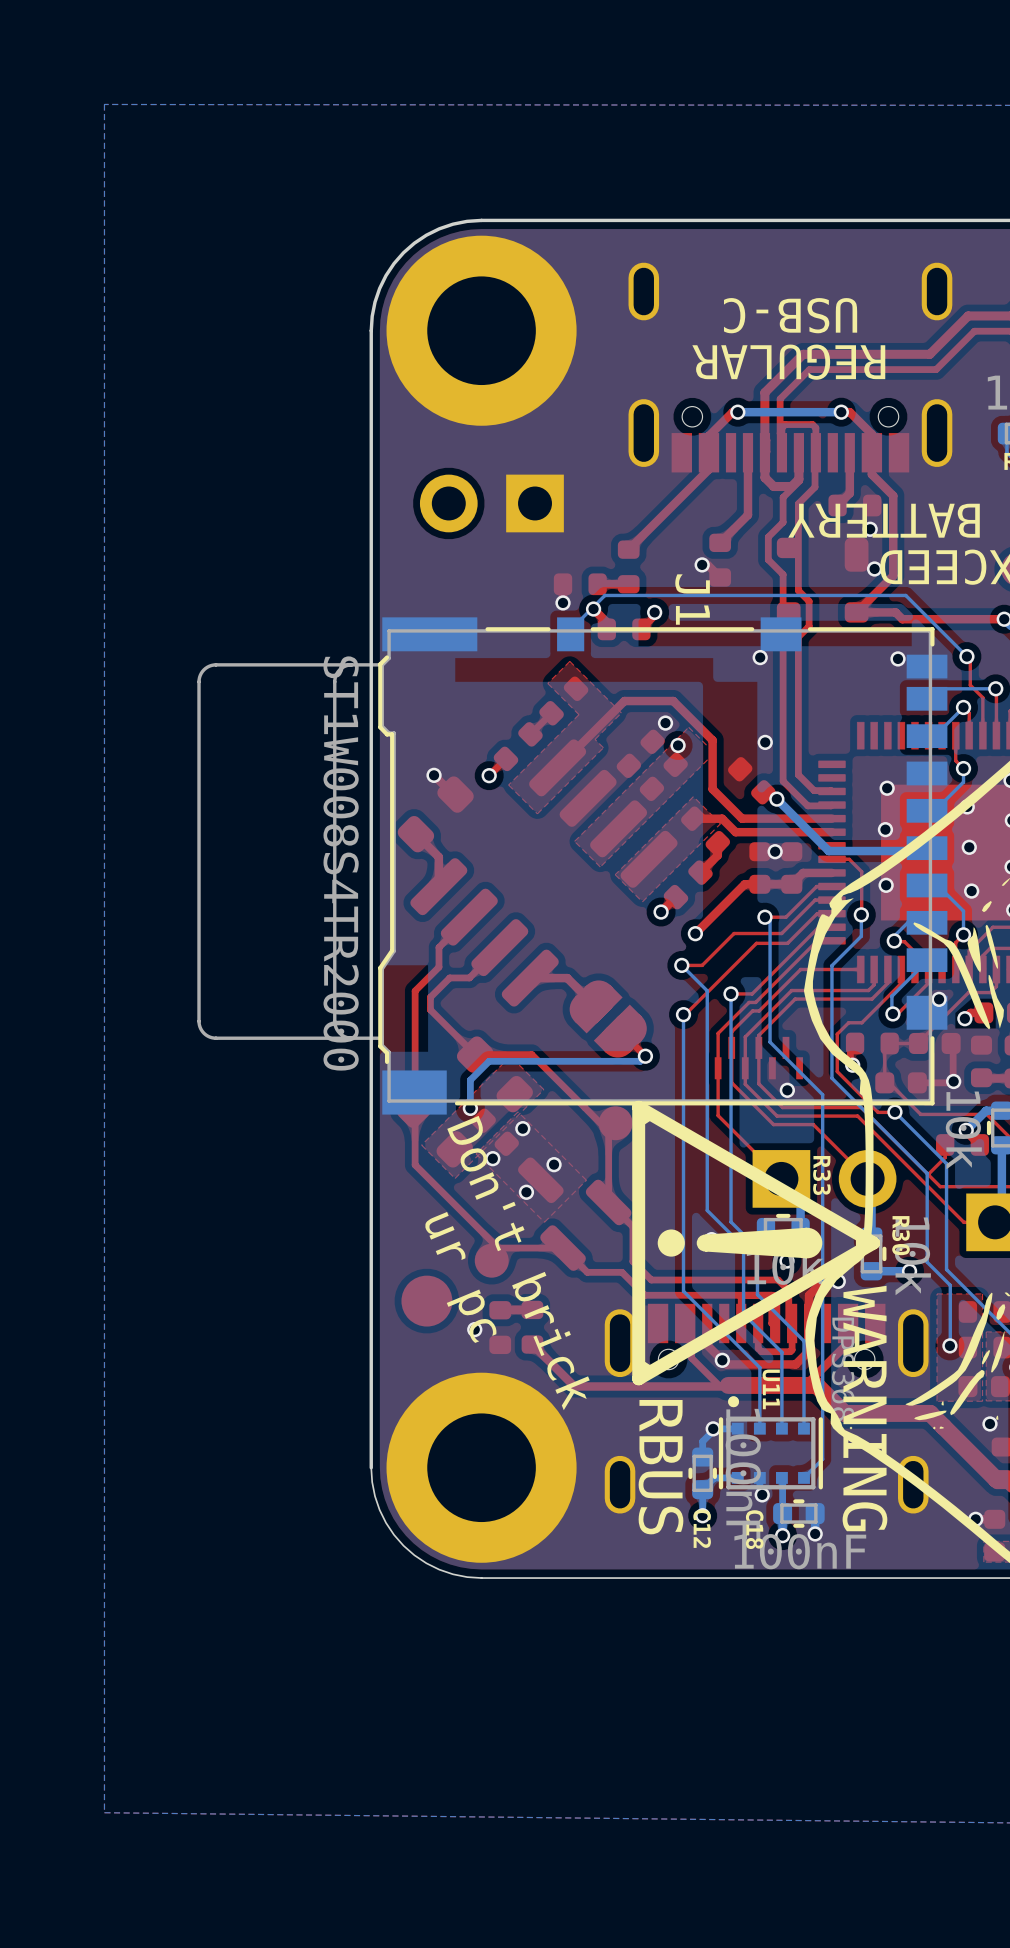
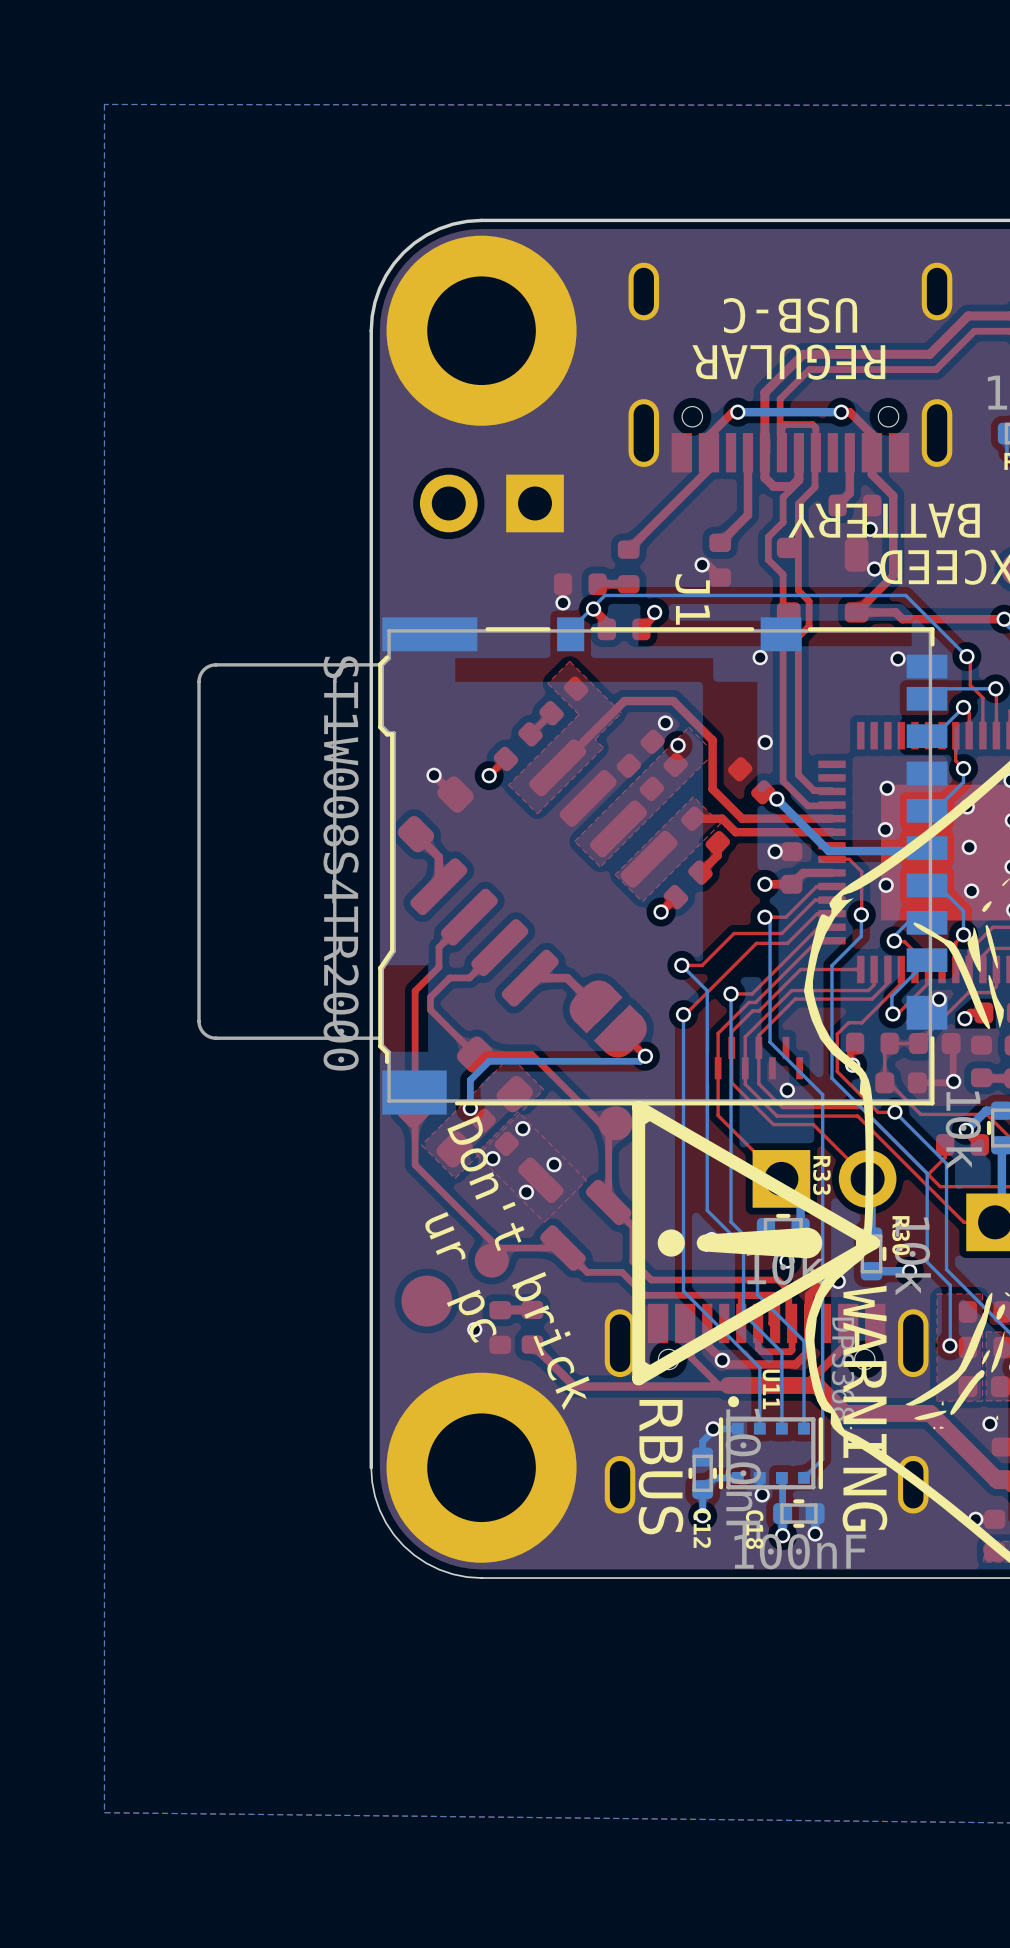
part: (759, 868) -> none
top track: (764, 884) (744, 884) (695, 933) -> none
via position: (695, 933) -> (764, 884)

